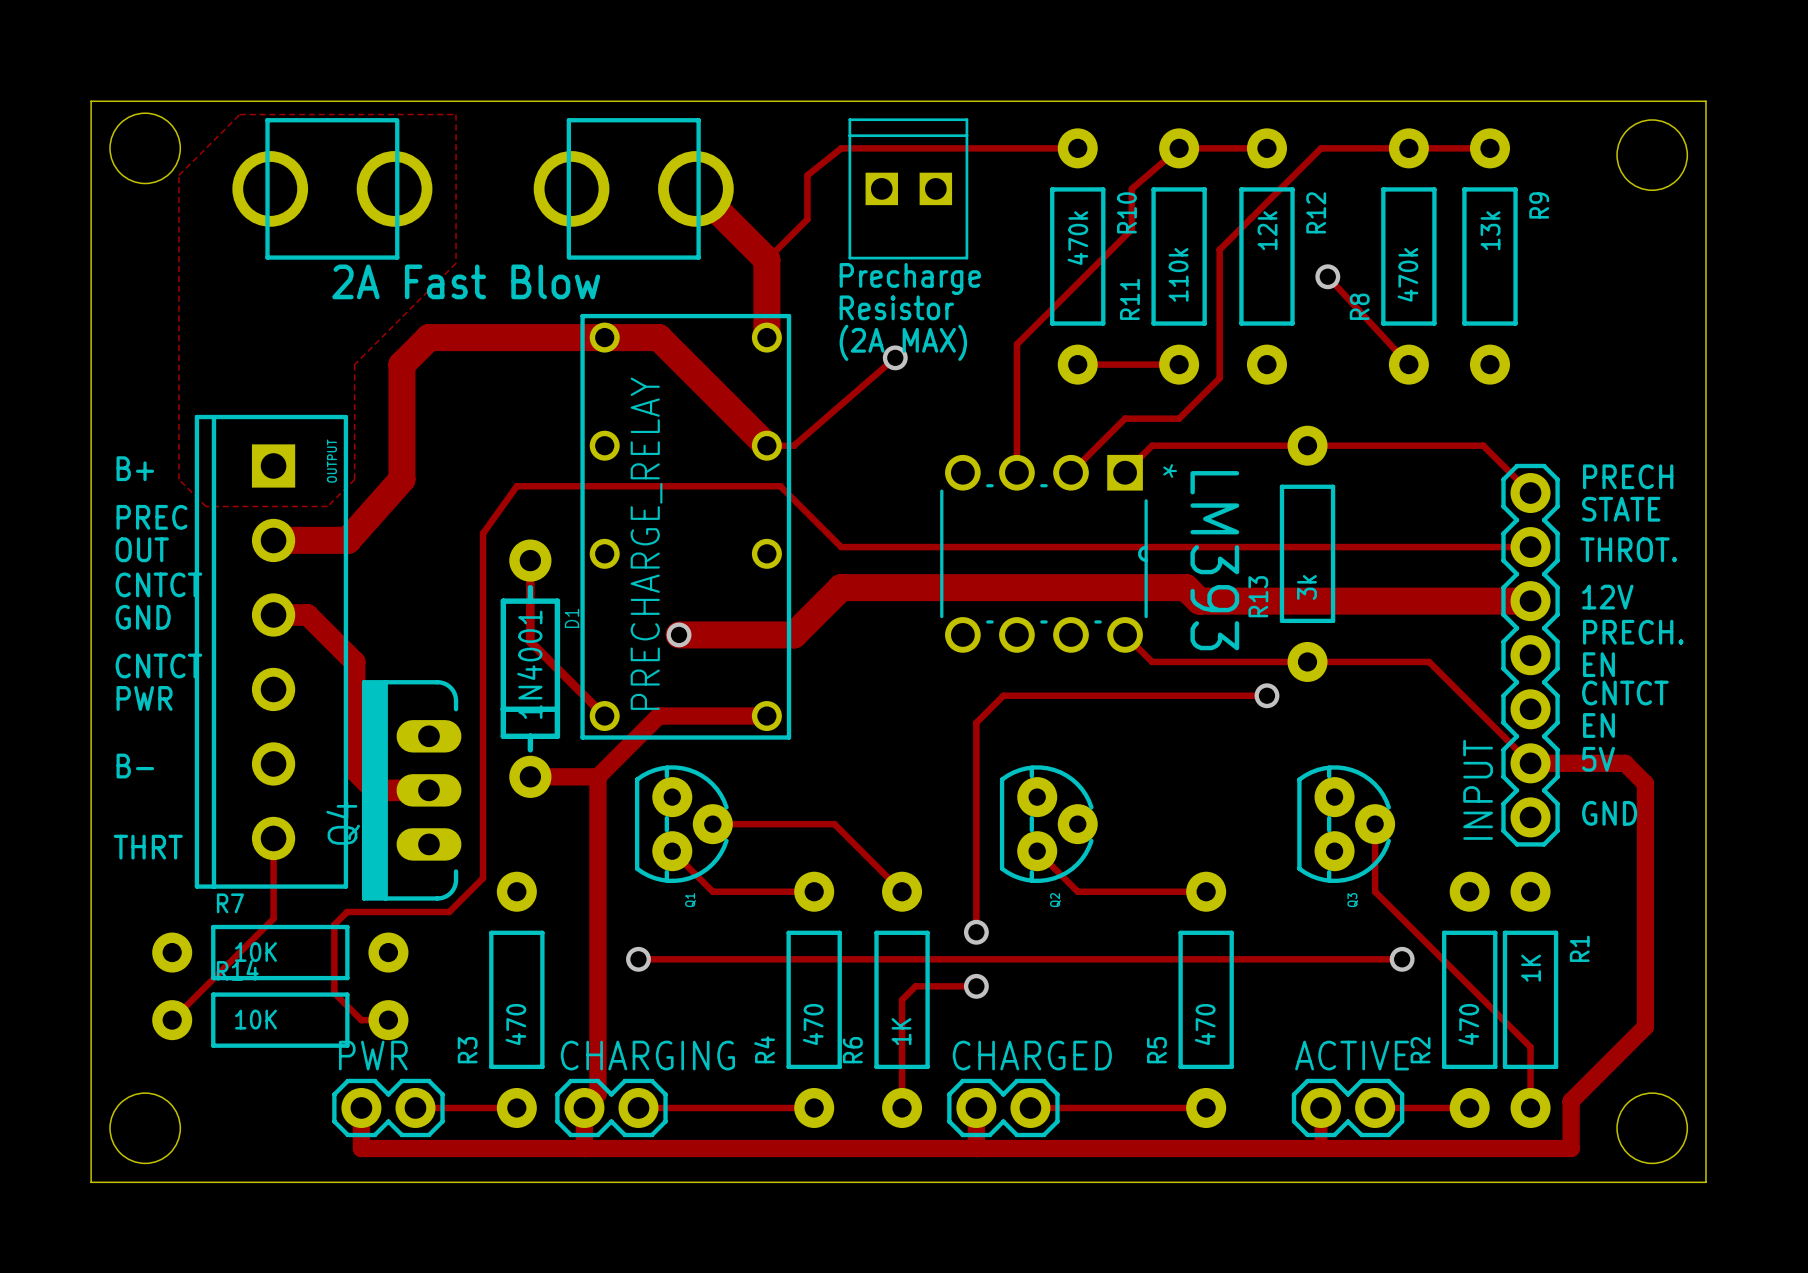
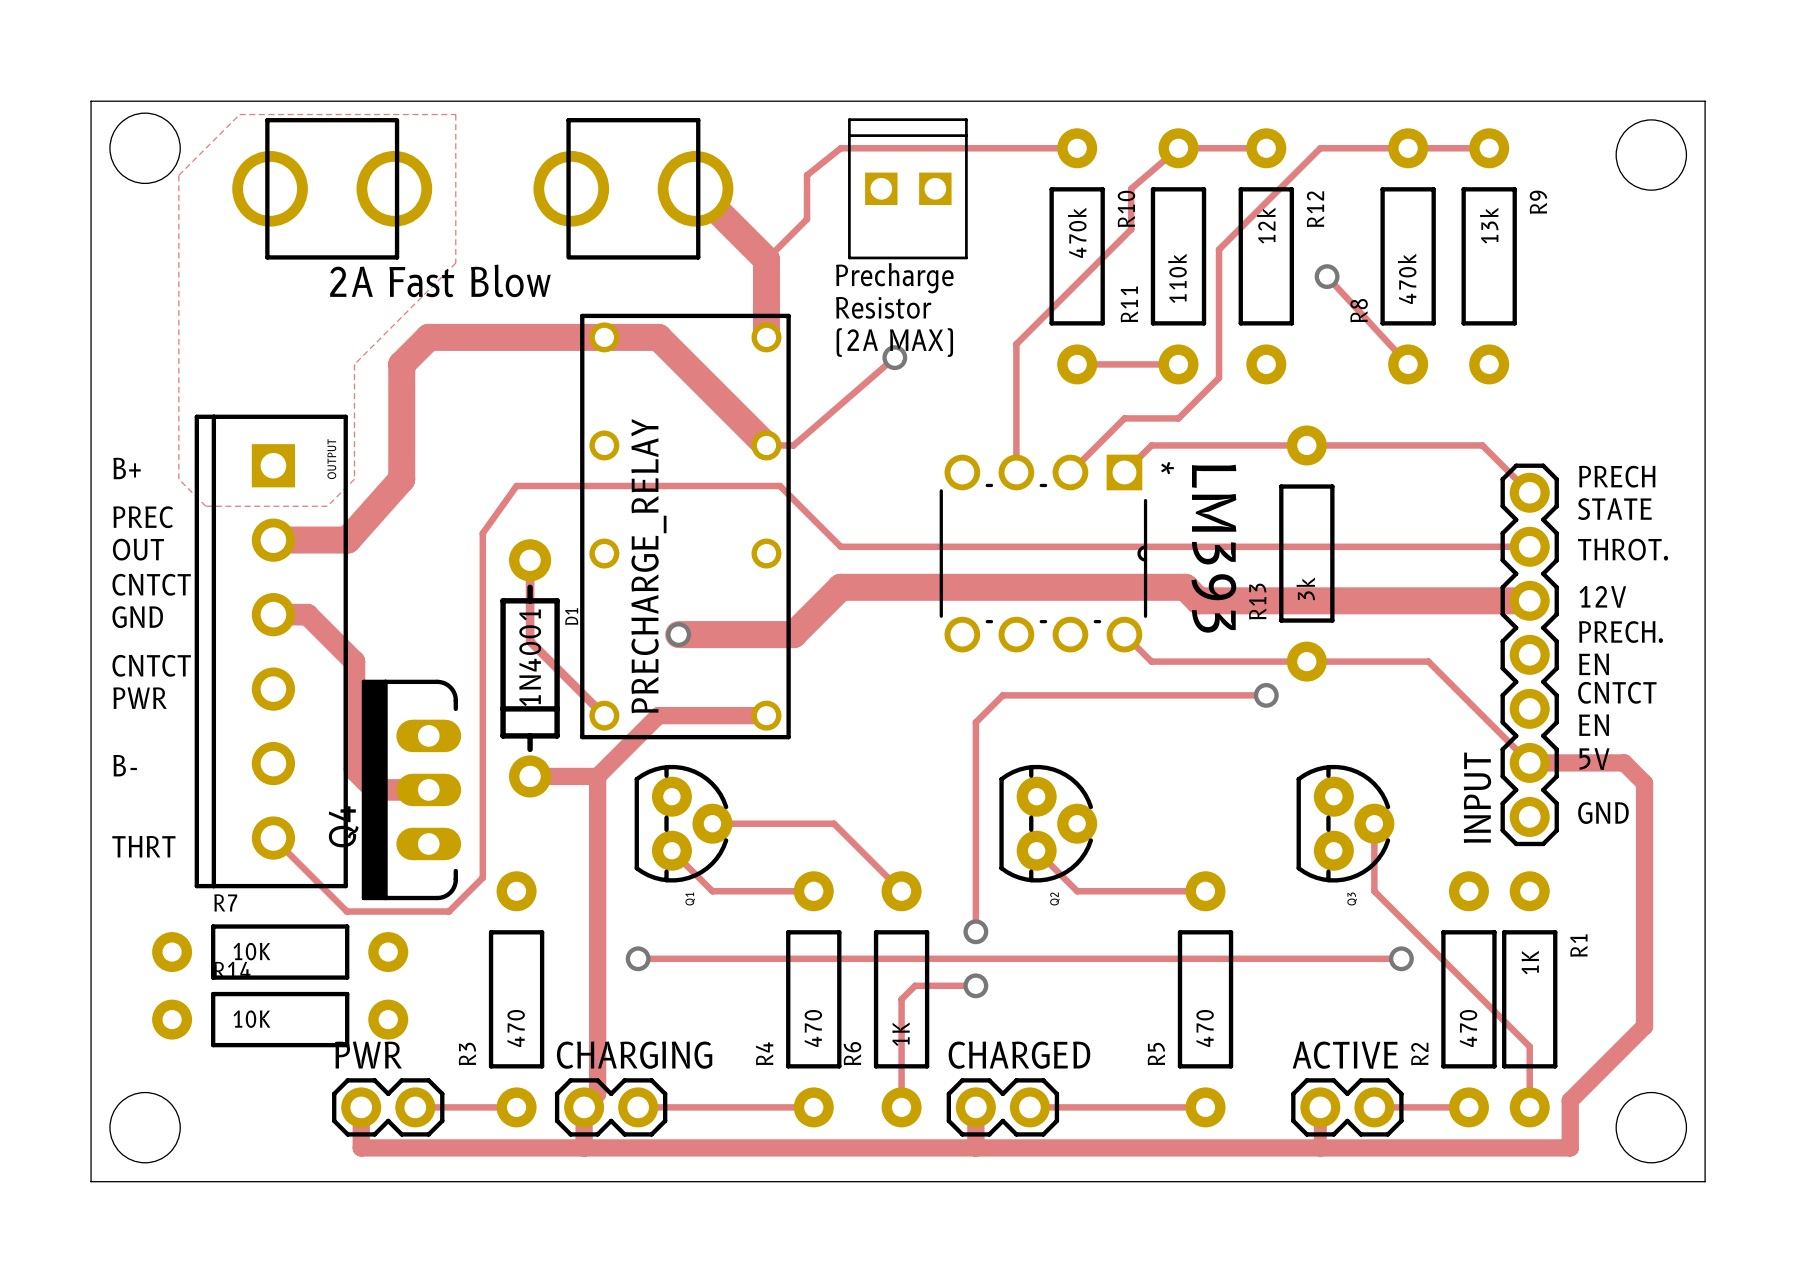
track: (273, 838) (273, 918) (172, 1020) -> (273, 838) (346, 911)
track: (347, 912) (334, 924) (334, 993) (361, 1020) (388, 1020) -> none

